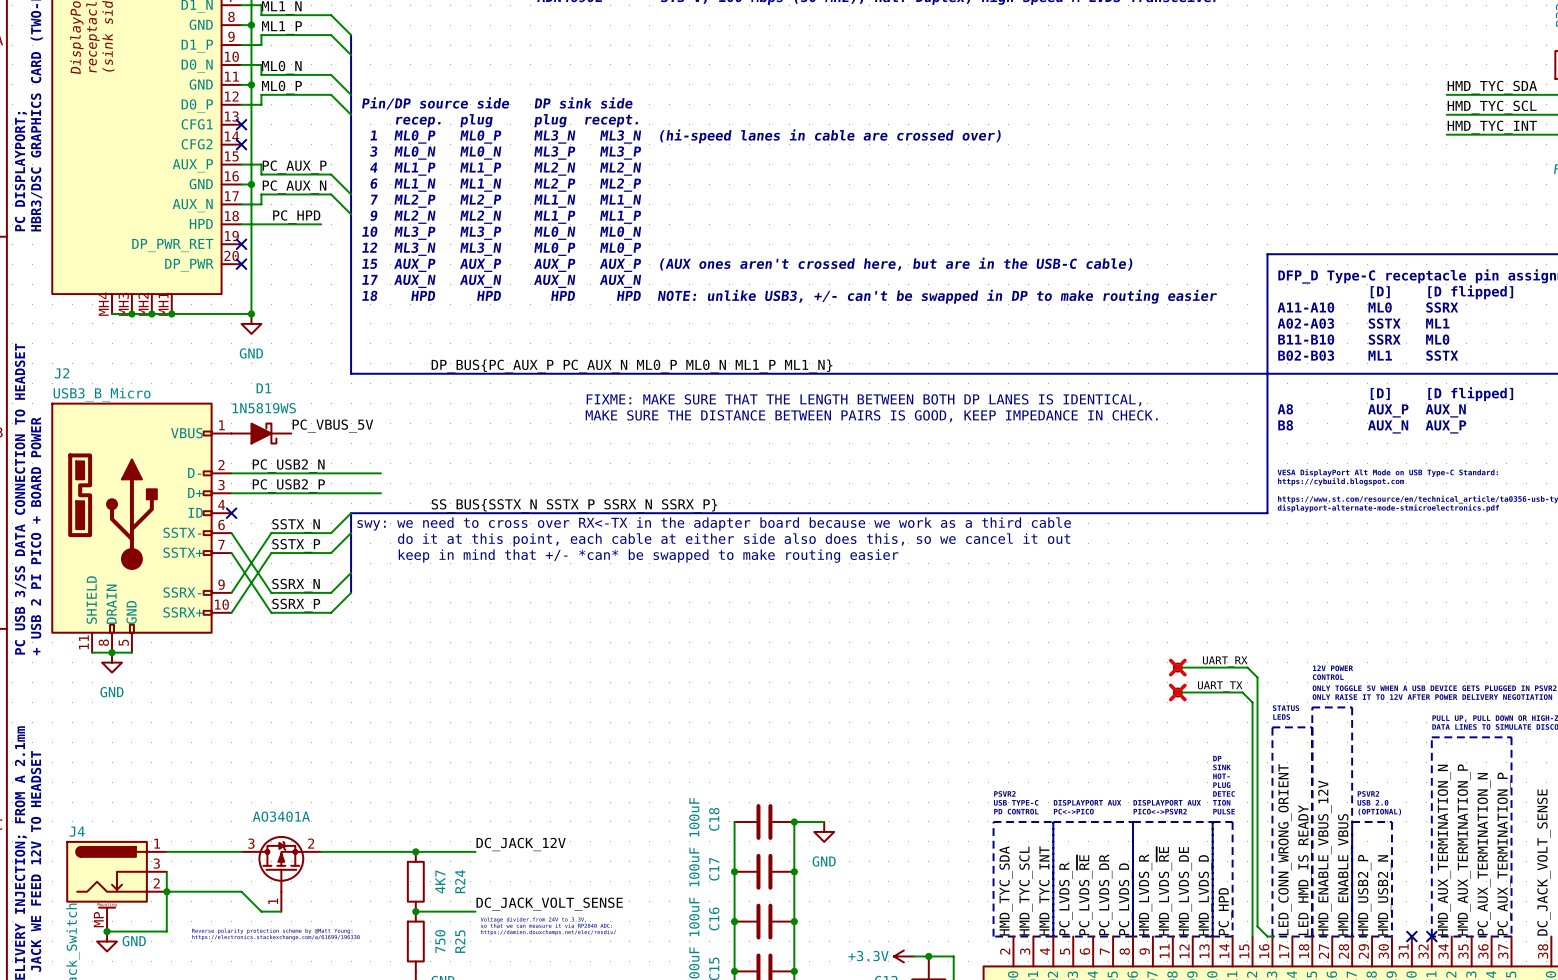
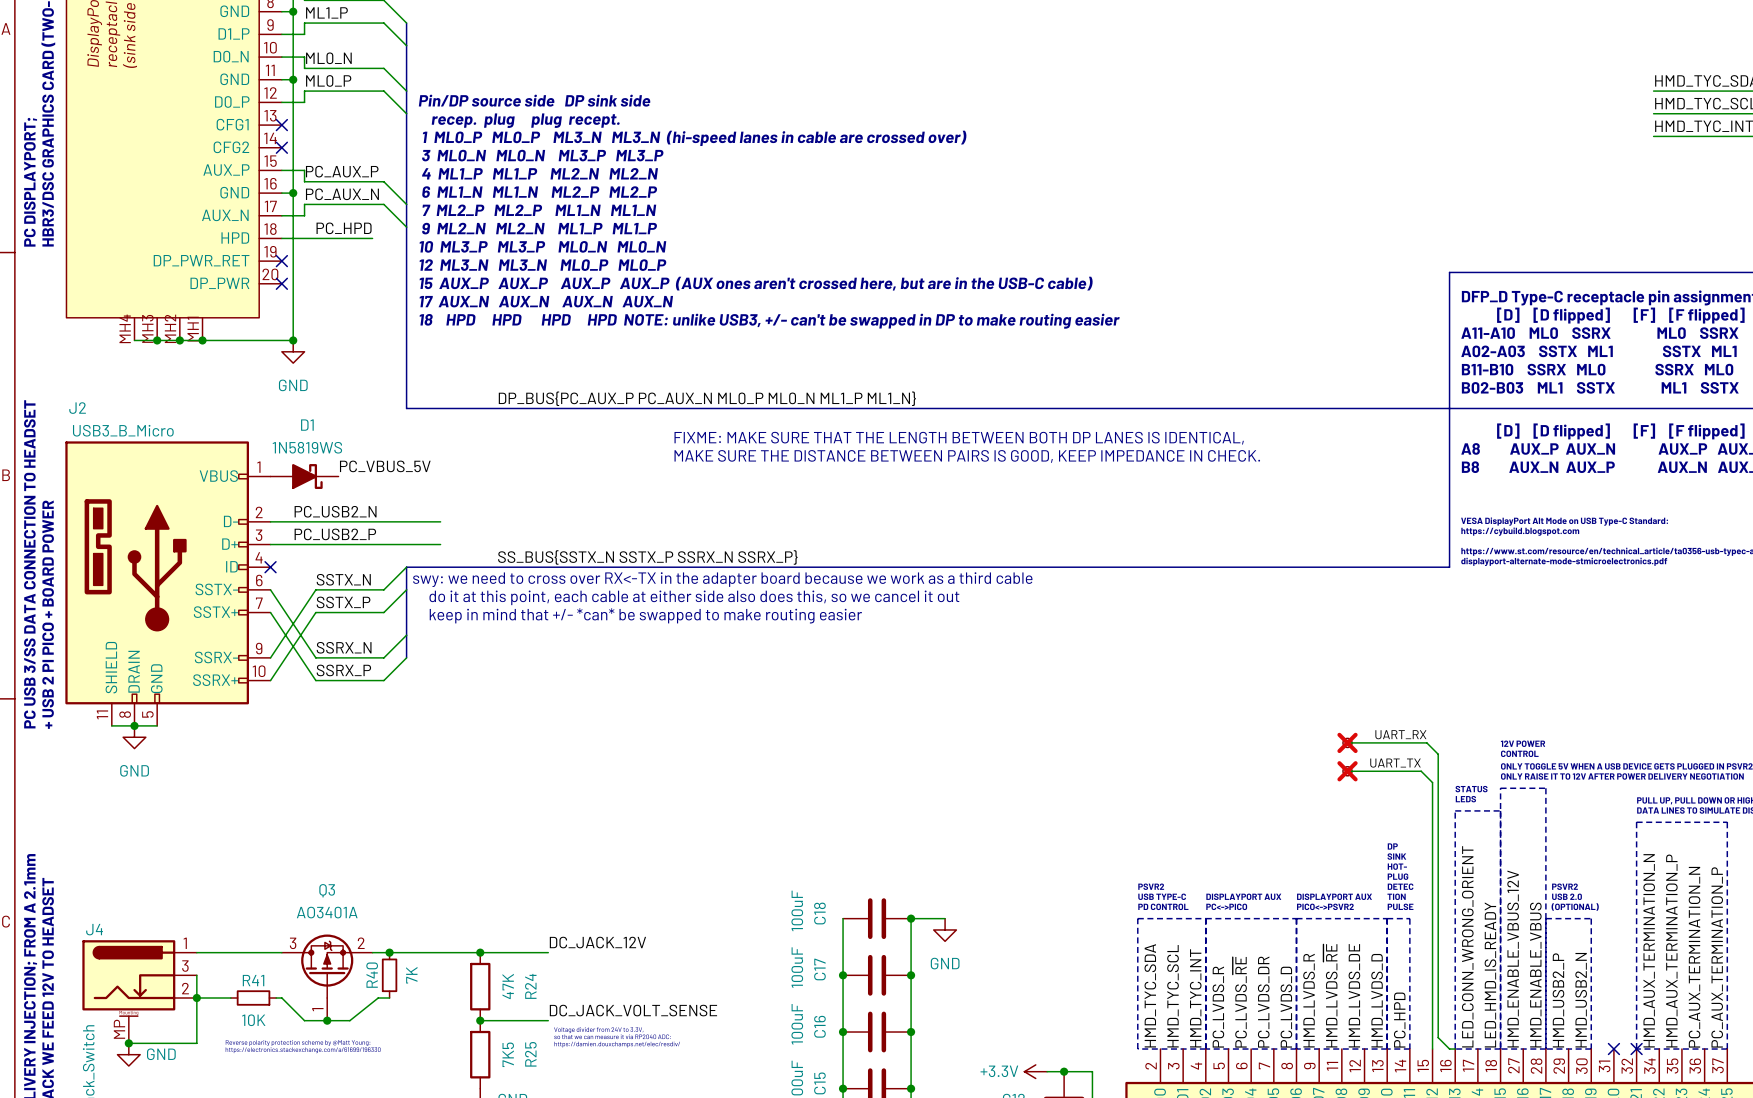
Q3 name: none -> Q3 (327, 890)
junction: none -> (389, 952)
R40: none -> 7K (389, 975)
R24 value: 4K7 (440, 881) -> 47K (508, 986)
wire: (196, 891) (236, 891) -> none
R41: none -> 10K (253, 998)
wire: none -> (389, 998) (378, 998) (349, 1020) (327, 1020)
junction: none -> (327, 1020)
R25 value: 750 (440, 941) -> 7K5 (508, 1054)

